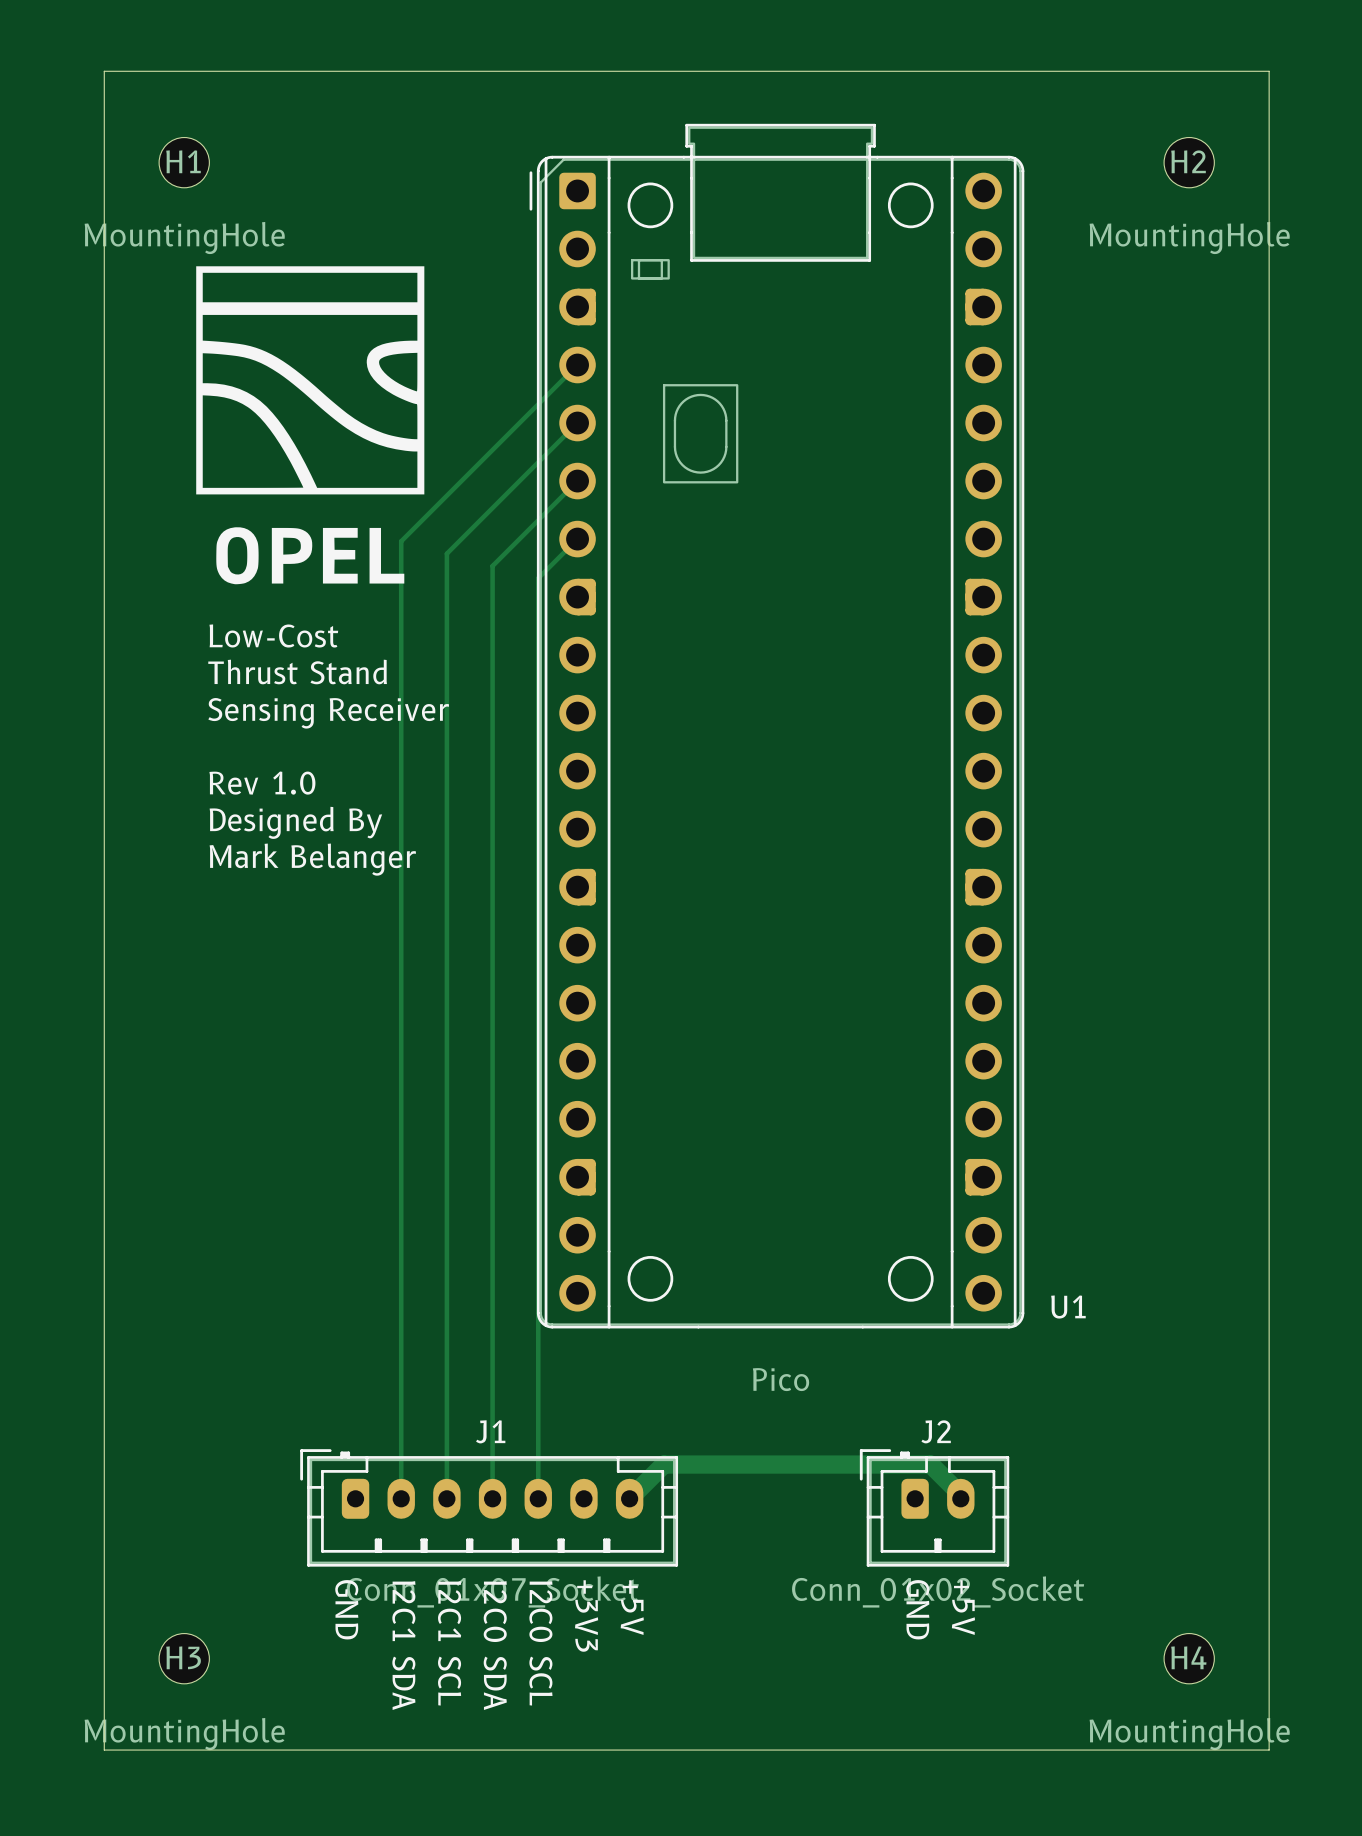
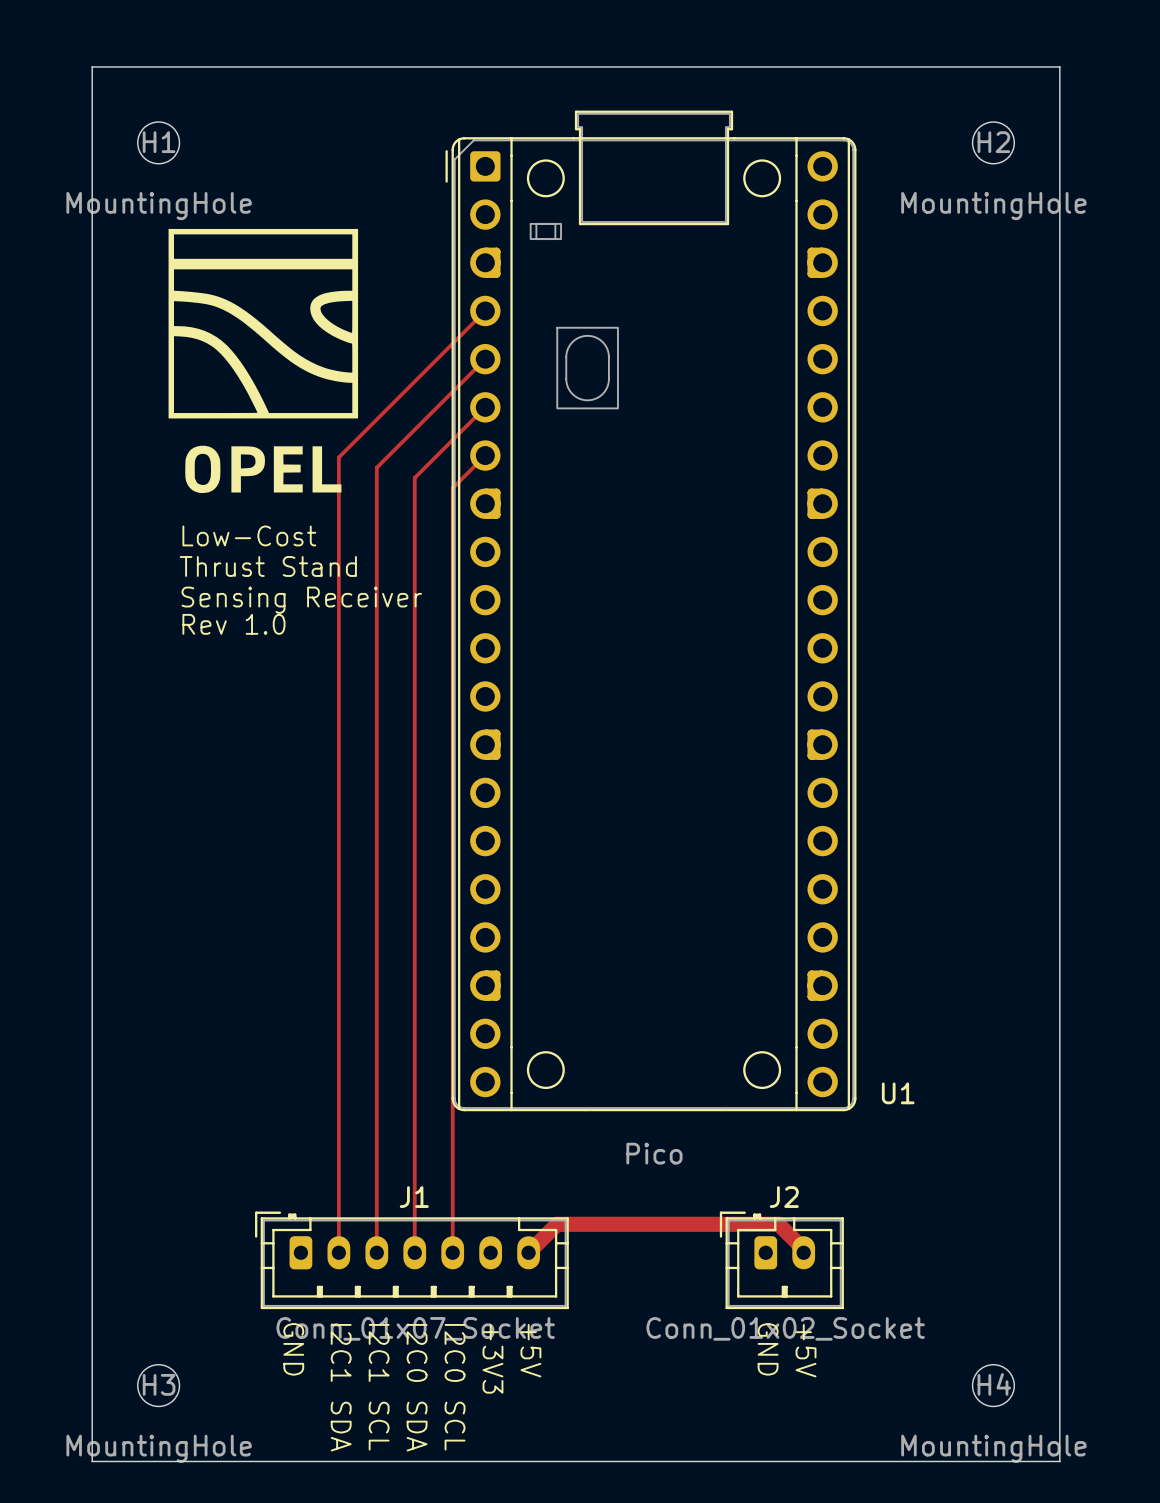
text position: Rev 1.0 (262, 783) -> Rev 1.0 (233, 624)
text: Designed By (295, 822) -> none
text: Mark Belanger (312, 859) -> none

